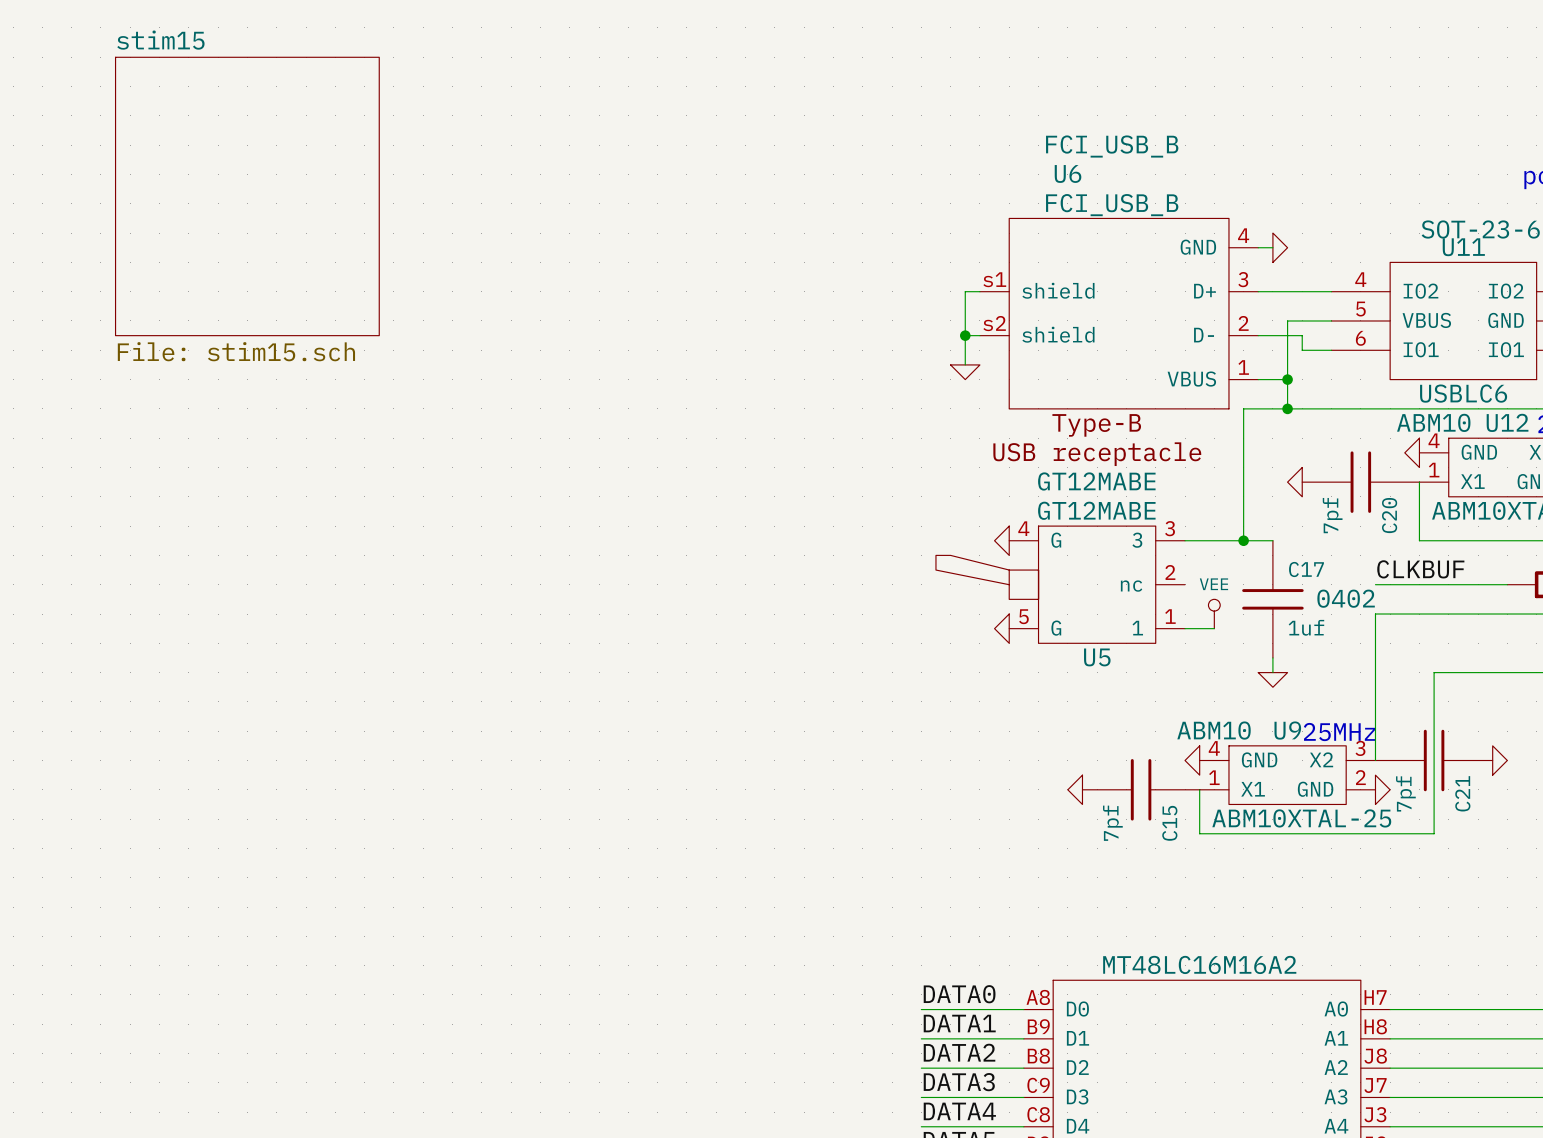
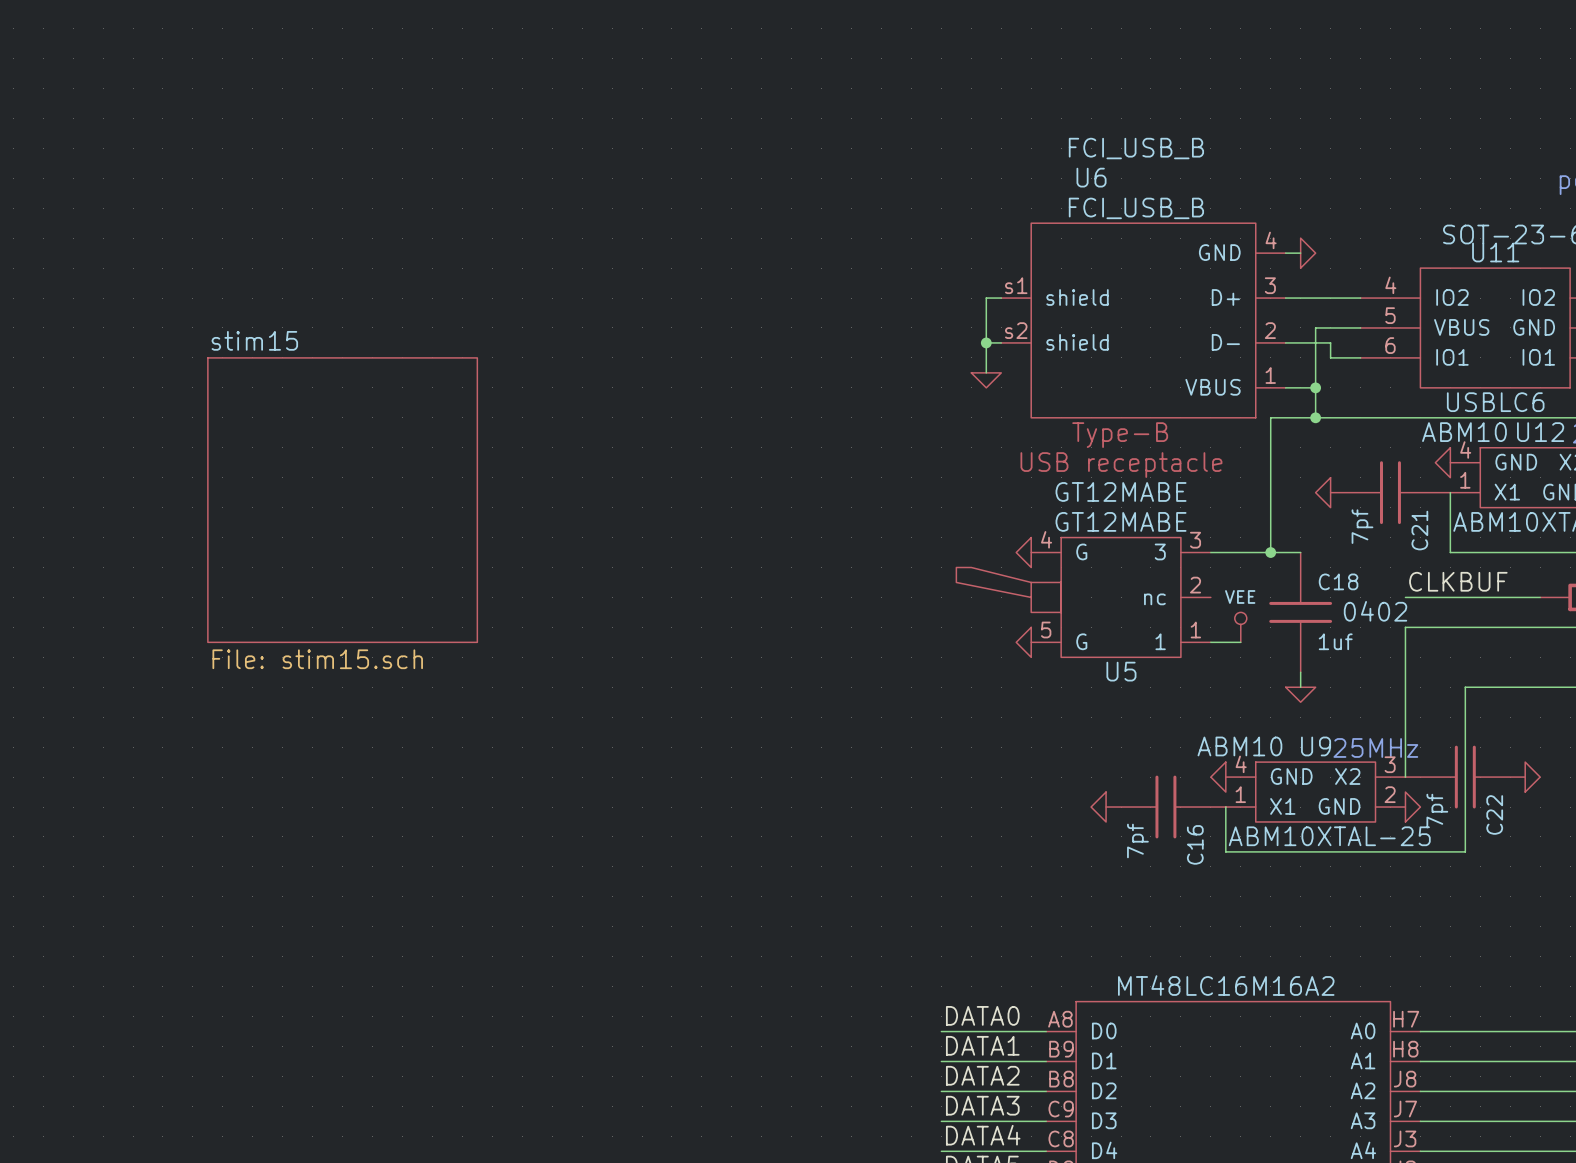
sheet stim15 position: (247, 196) -> (342, 500)
C20 name: C20 (1389, 515) -> C21 (1419, 530)
C17 name: C17 (1306, 569) -> C18 (1338, 581)
C21 name: C21 (1462, 793) -> C22 (1494, 814)
C15 name: C15 (1169, 823) -> C16 (1195, 844)

